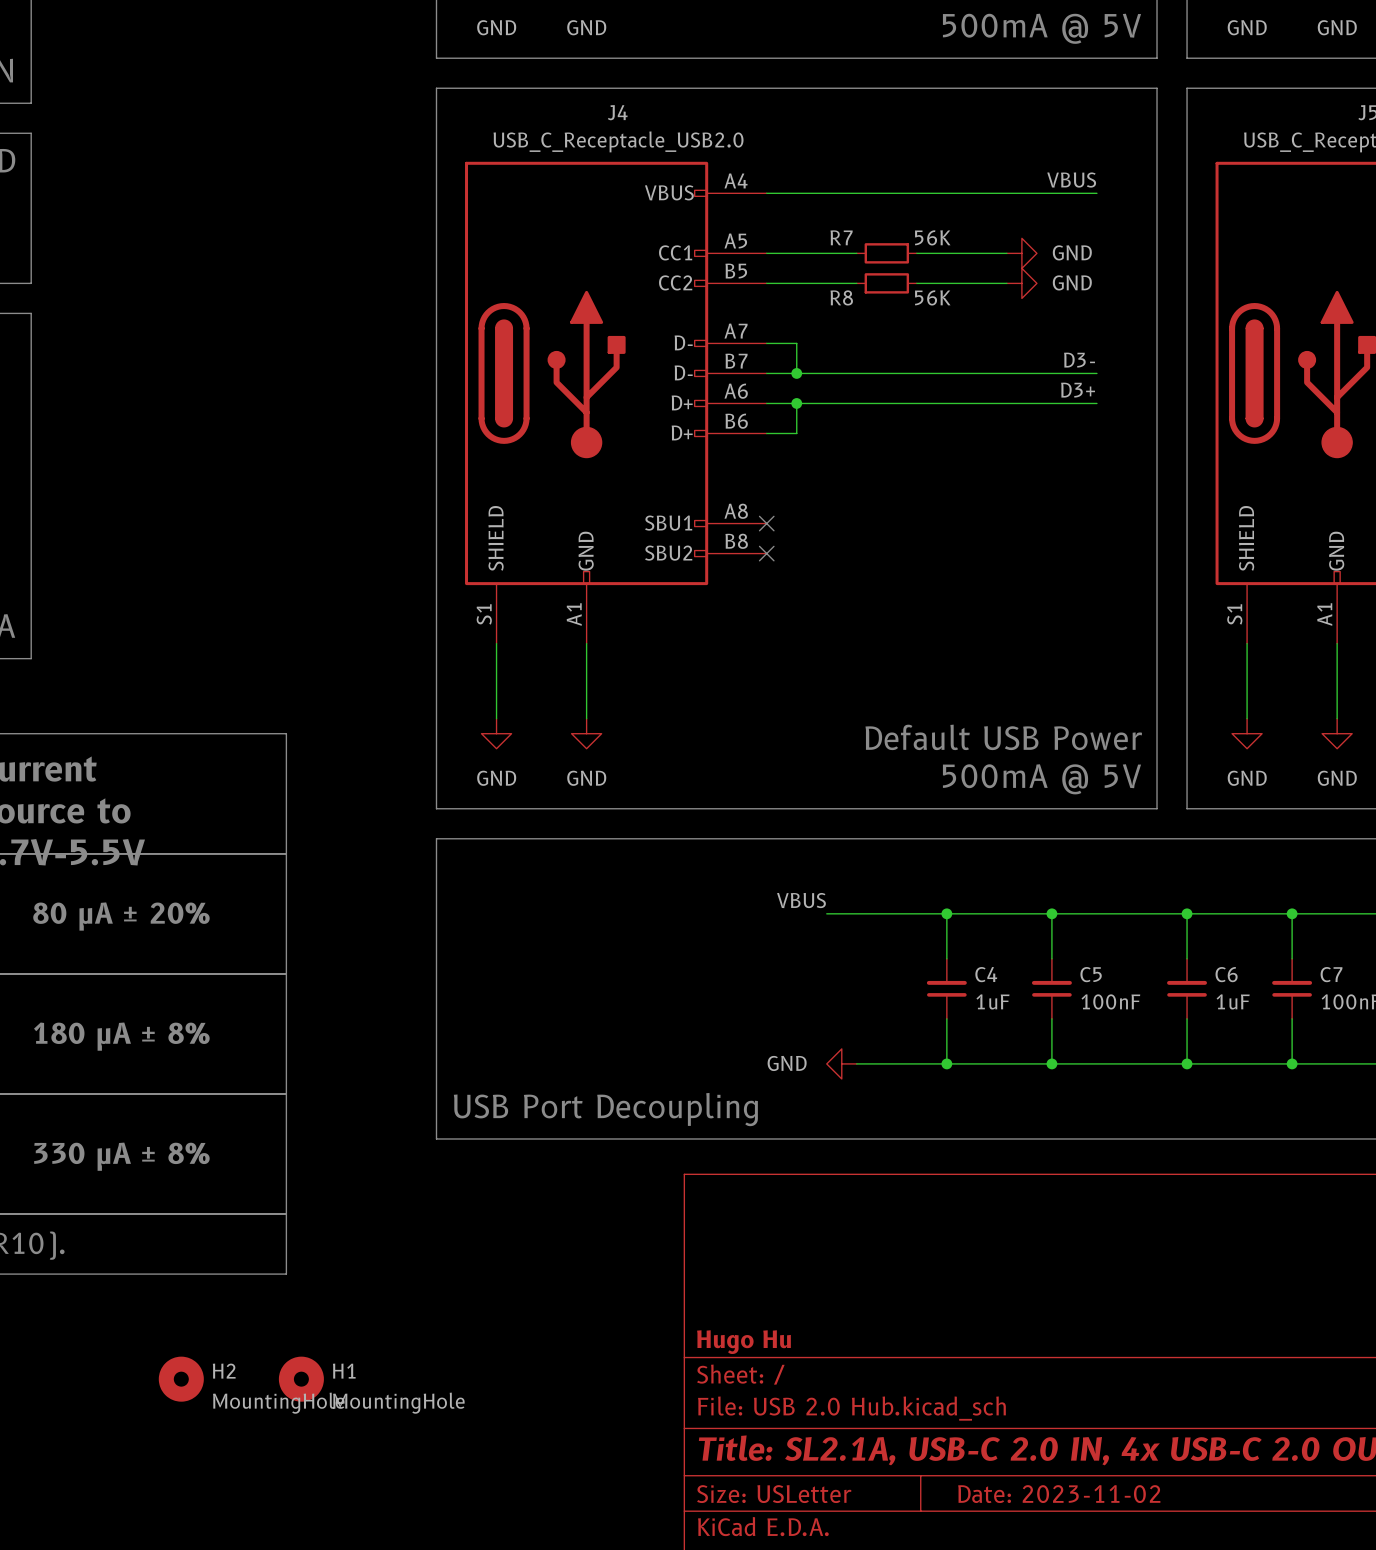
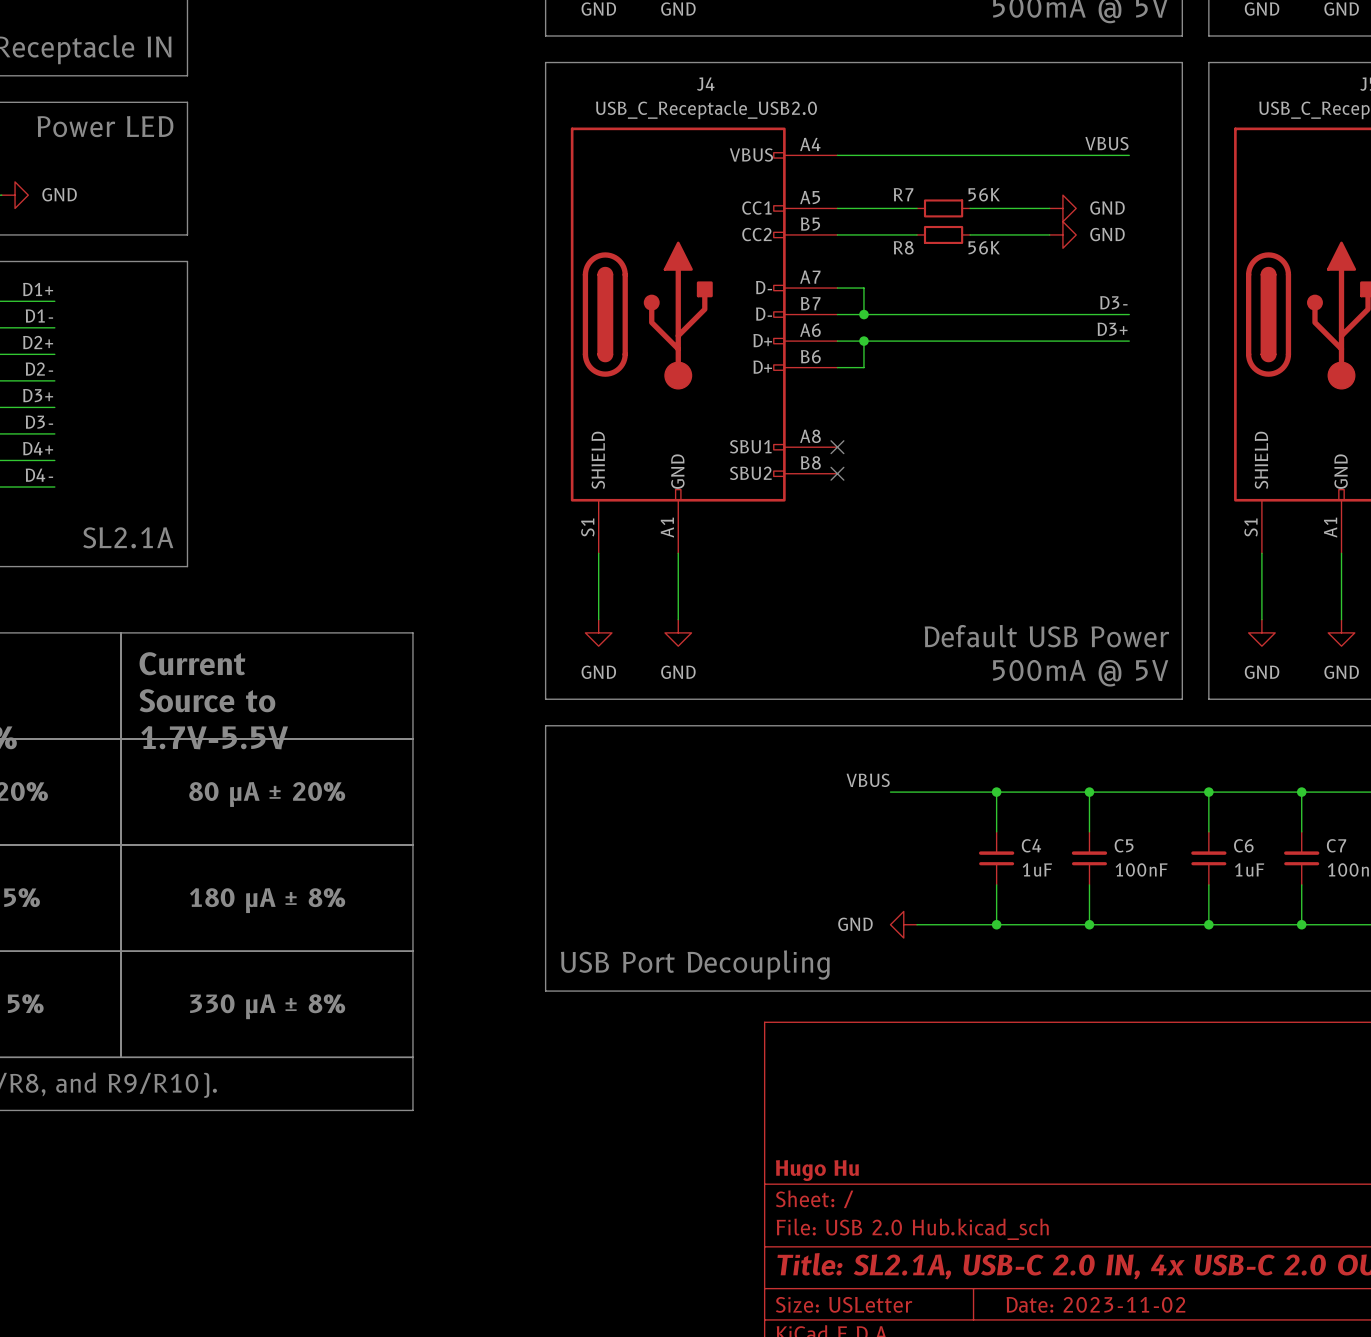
H2: MountingHole (181, 1379) -> none
H1: MountingHole (301, 1379) -> none

